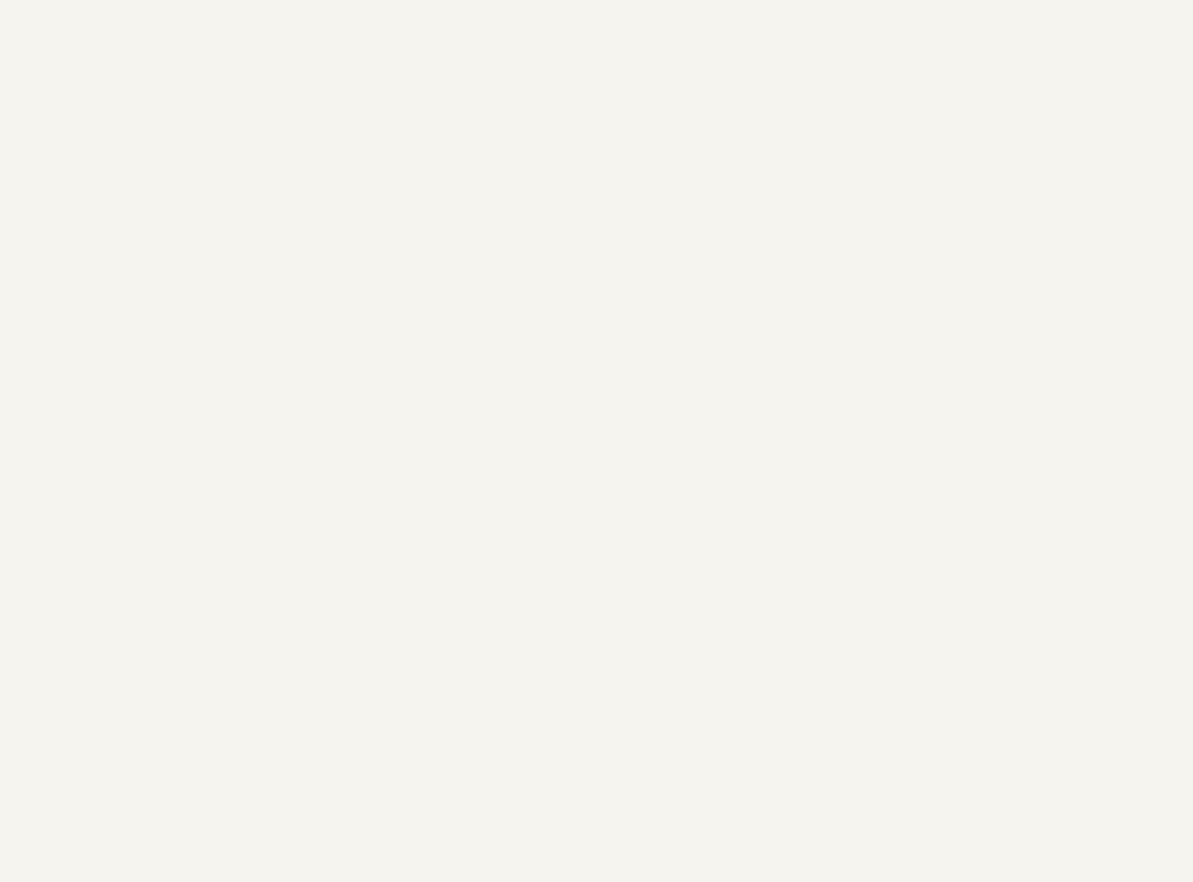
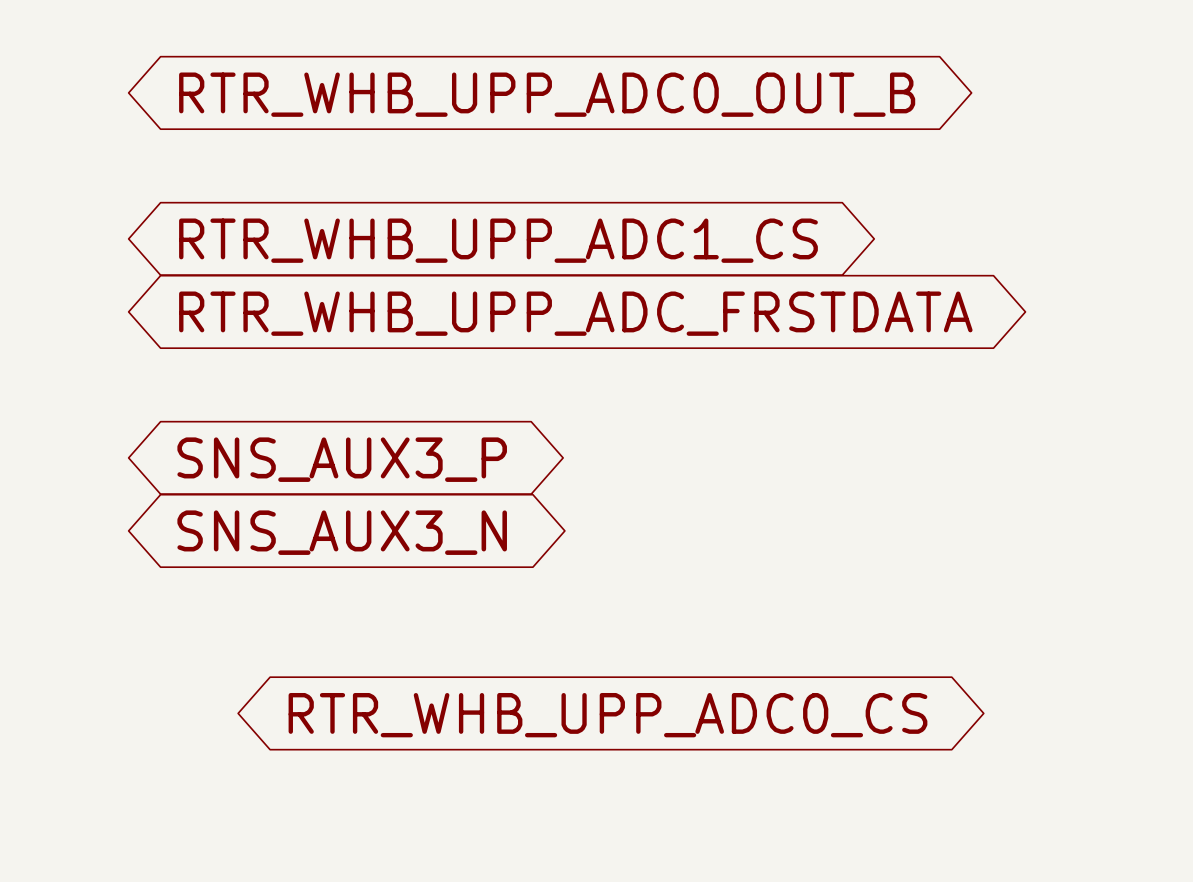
global label: none -> RTR_WHB_UPP_ADC0_OUT_B (547, 94)
global label: none -> RTR_WHB_UPP_ADC1_CS (498, 240)
global label: none -> RTR_WHB_UPP_ADC_FRSTDATA (575, 313)
global label: none -> SNS_AUX3_P (342, 459)
global label: none -> SNS_AUX3_N (342, 532)
global label: none -> RTR_WHB_UPP_ADC0_CS (607, 715)

